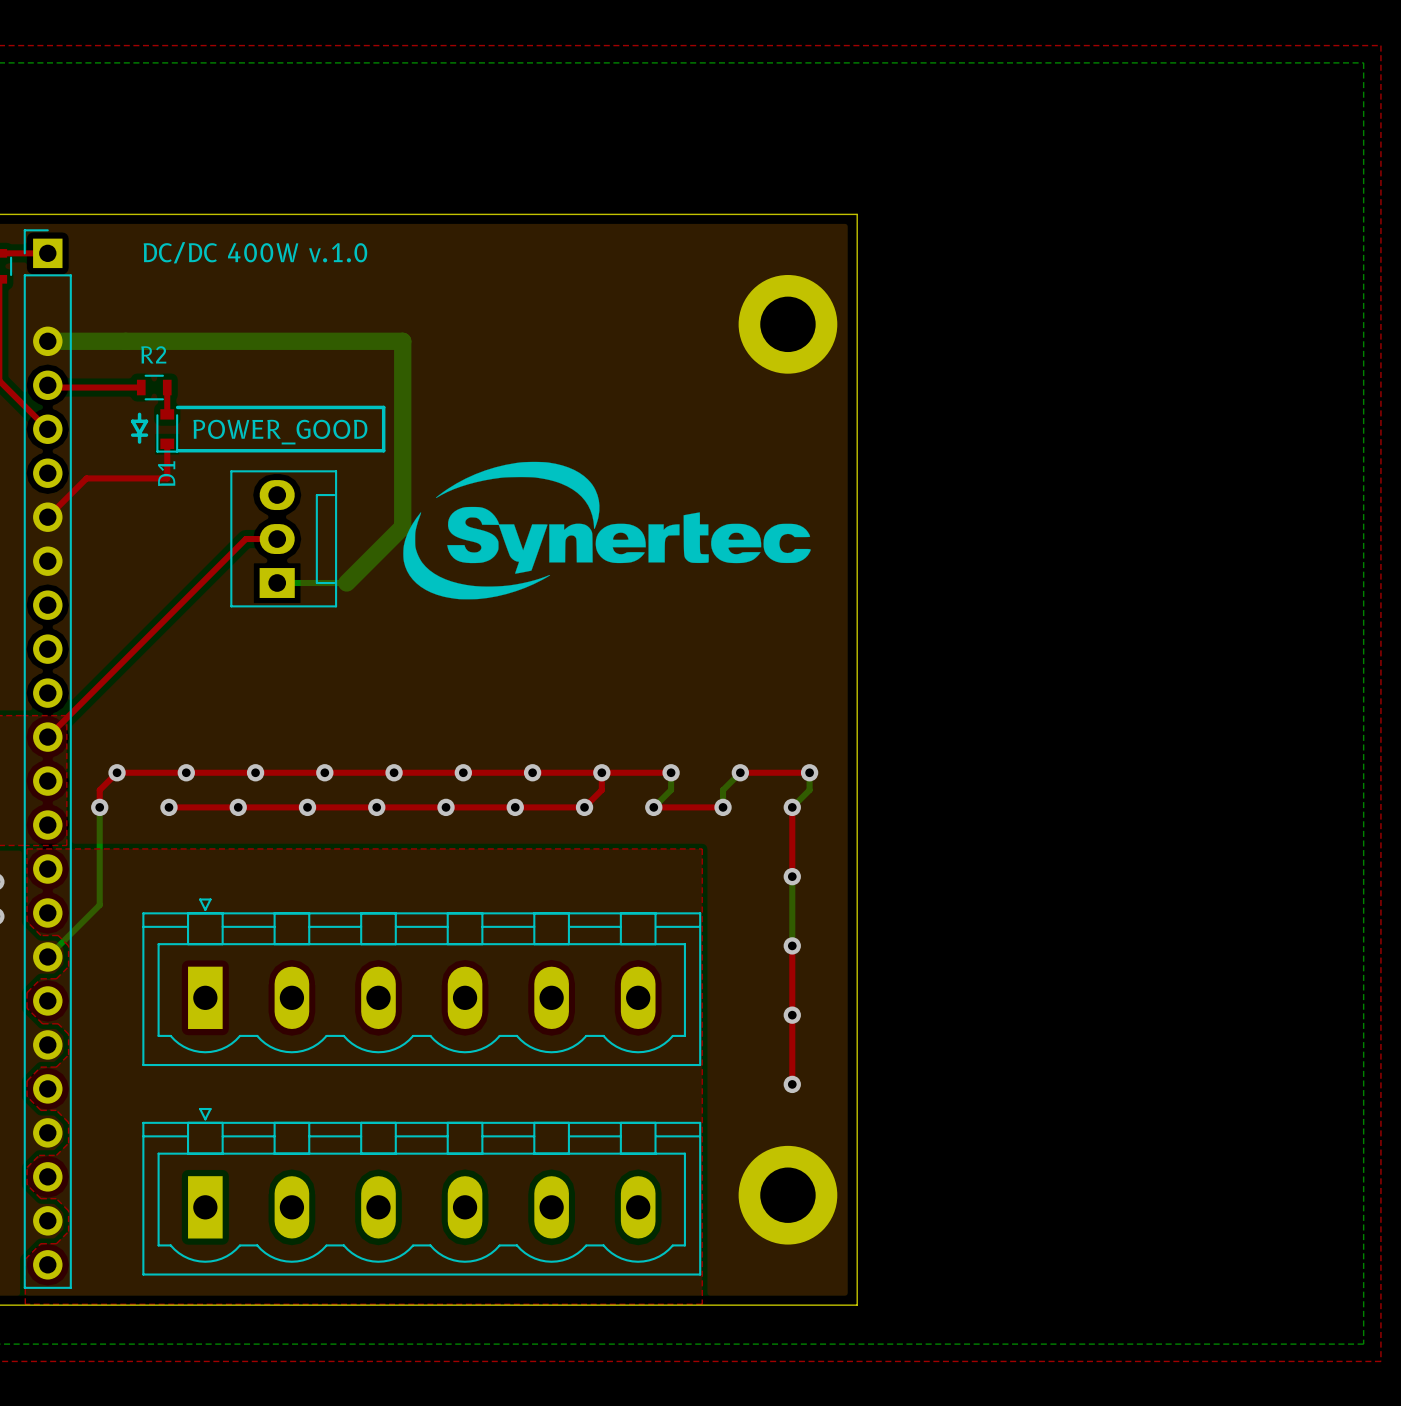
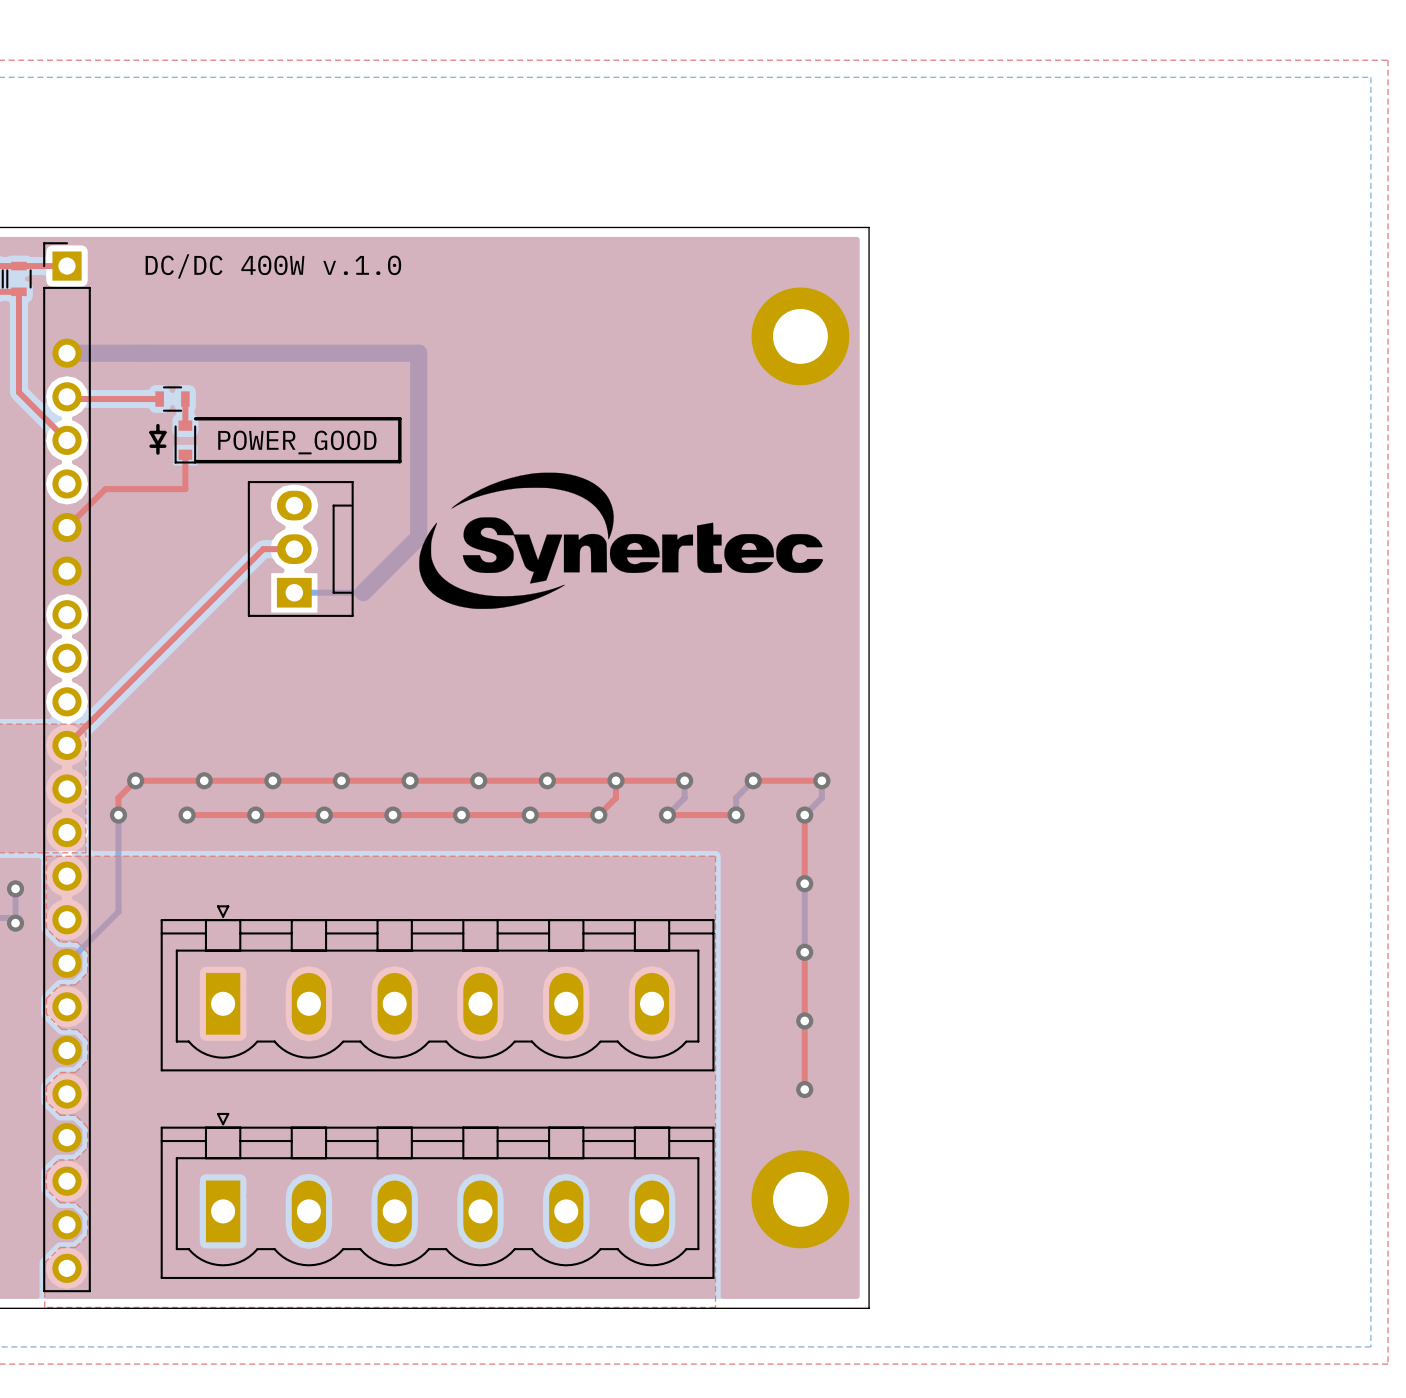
R2 name: R2 (153, 354) -> none
D1 name: D1 (166, 473) -> none

